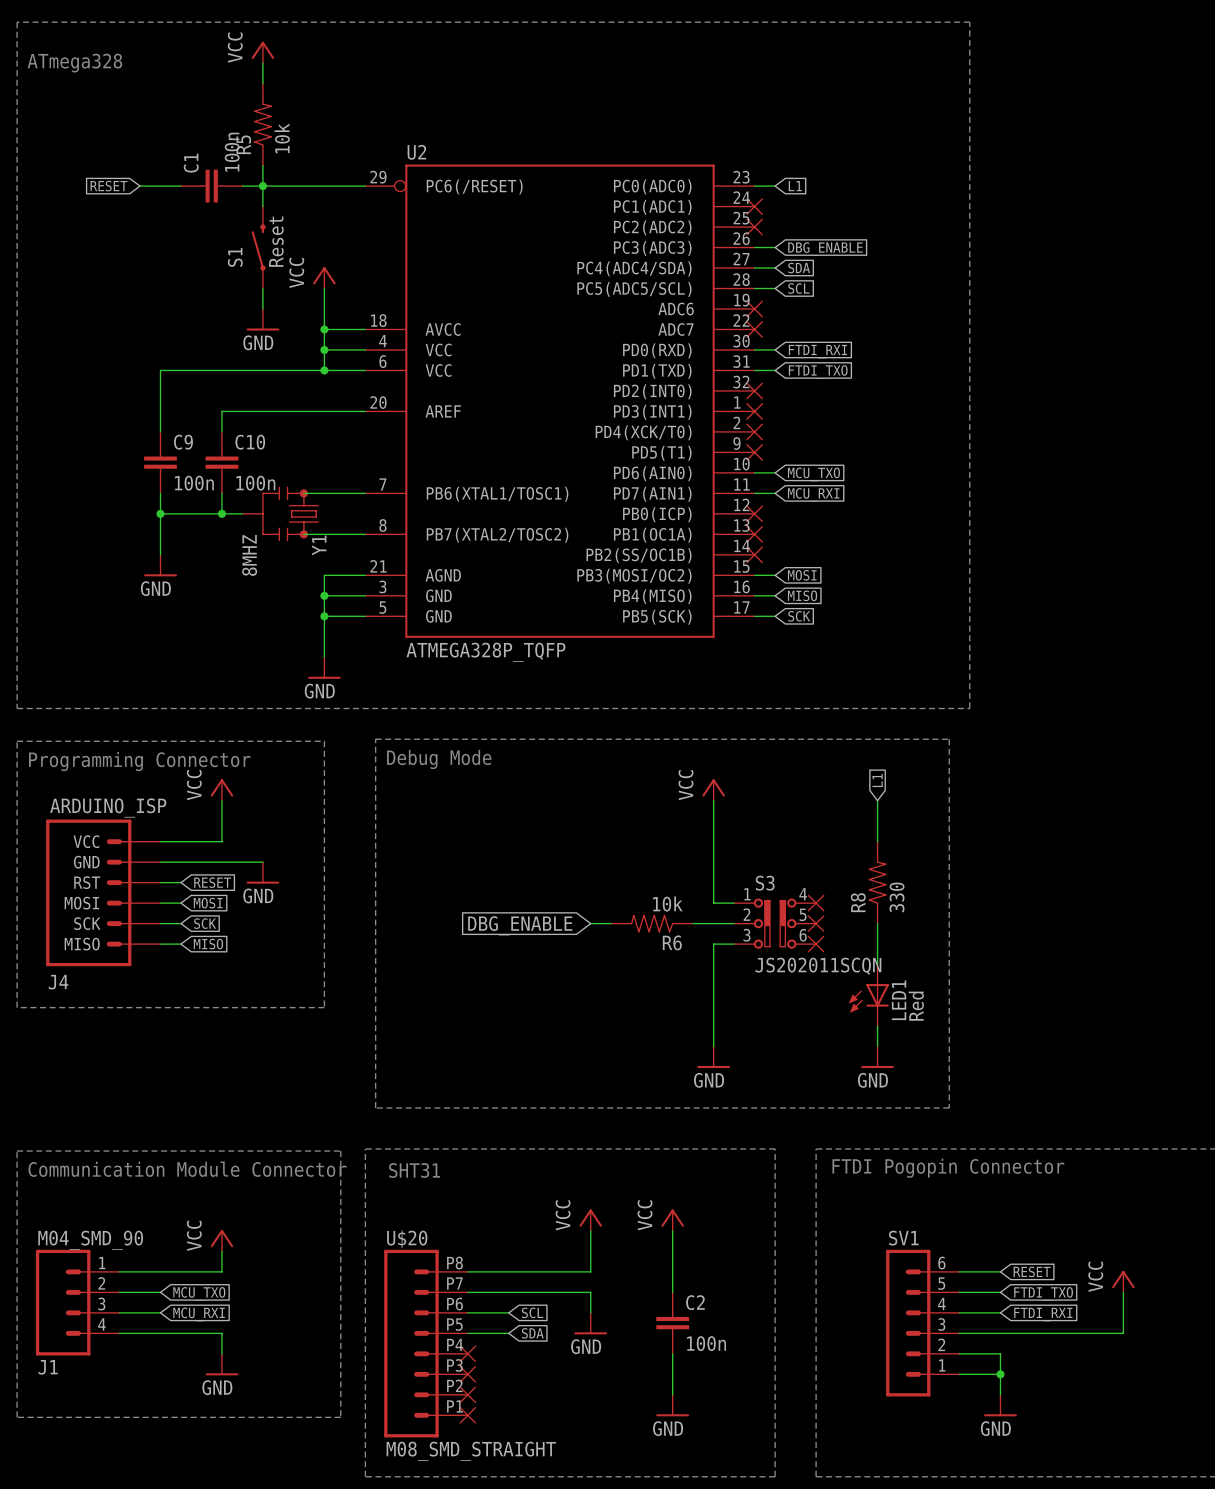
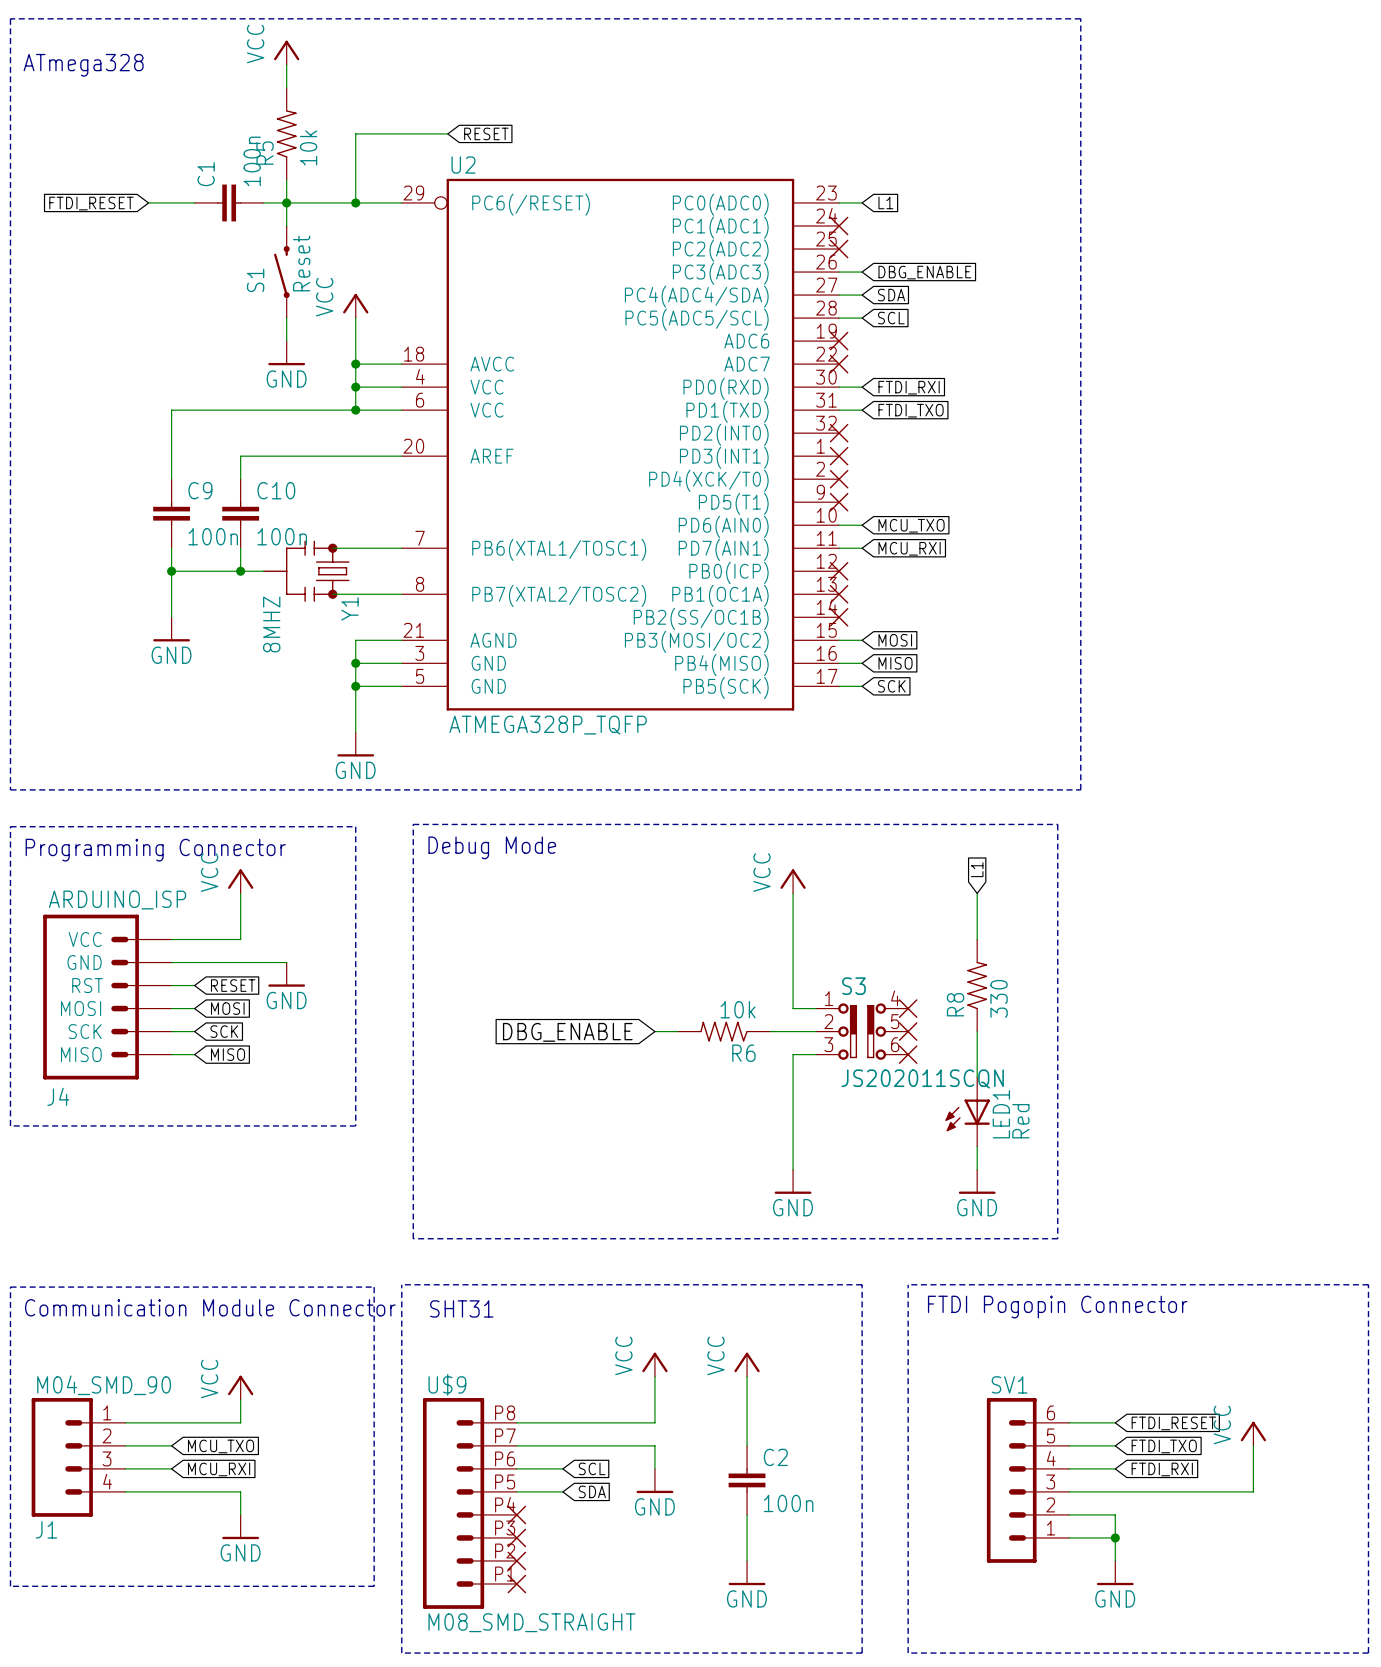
wire: none -> (447, 133) (355, 133) (355, 202)
global label: none -> RESET (486, 133)
global label: RESET (108, 186) -> FTDI_RESET (91, 203)
junction: none -> (355, 202)
U$20 name: U$20 (407, 1239) -> U$9 (447, 1384)
global label: RESET (1032, 1271) -> FTDI_RESET (1173, 1423)

